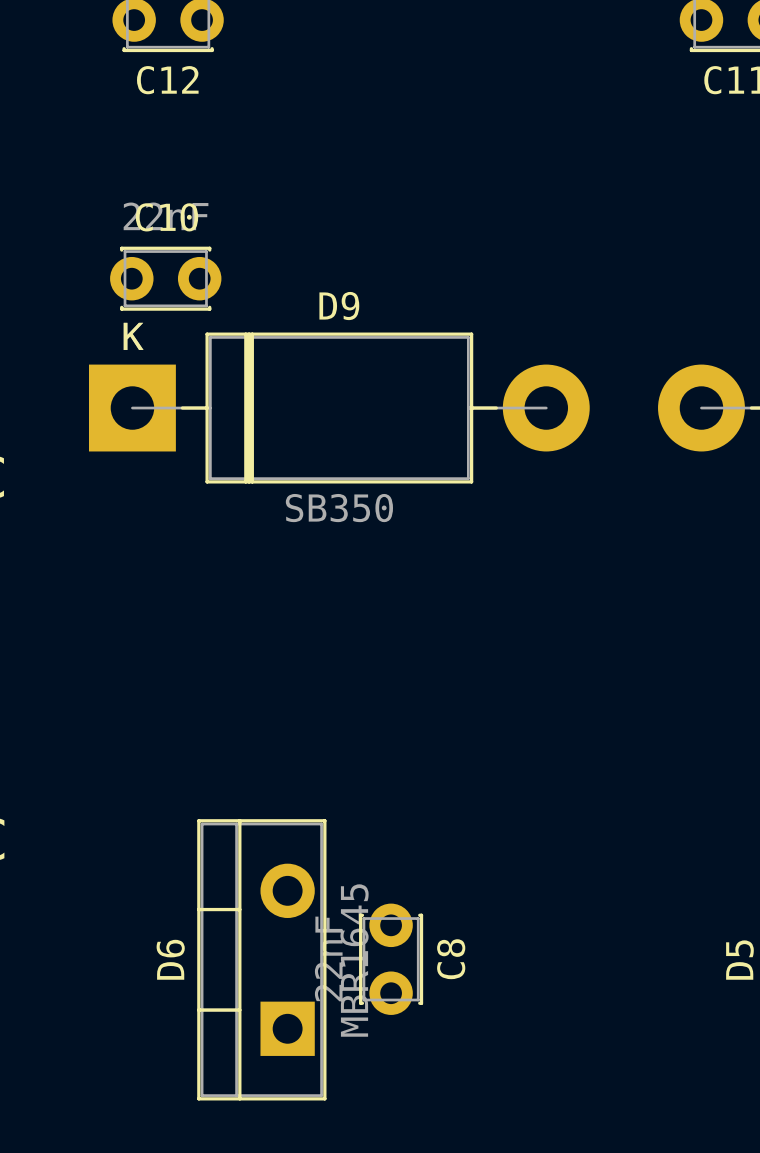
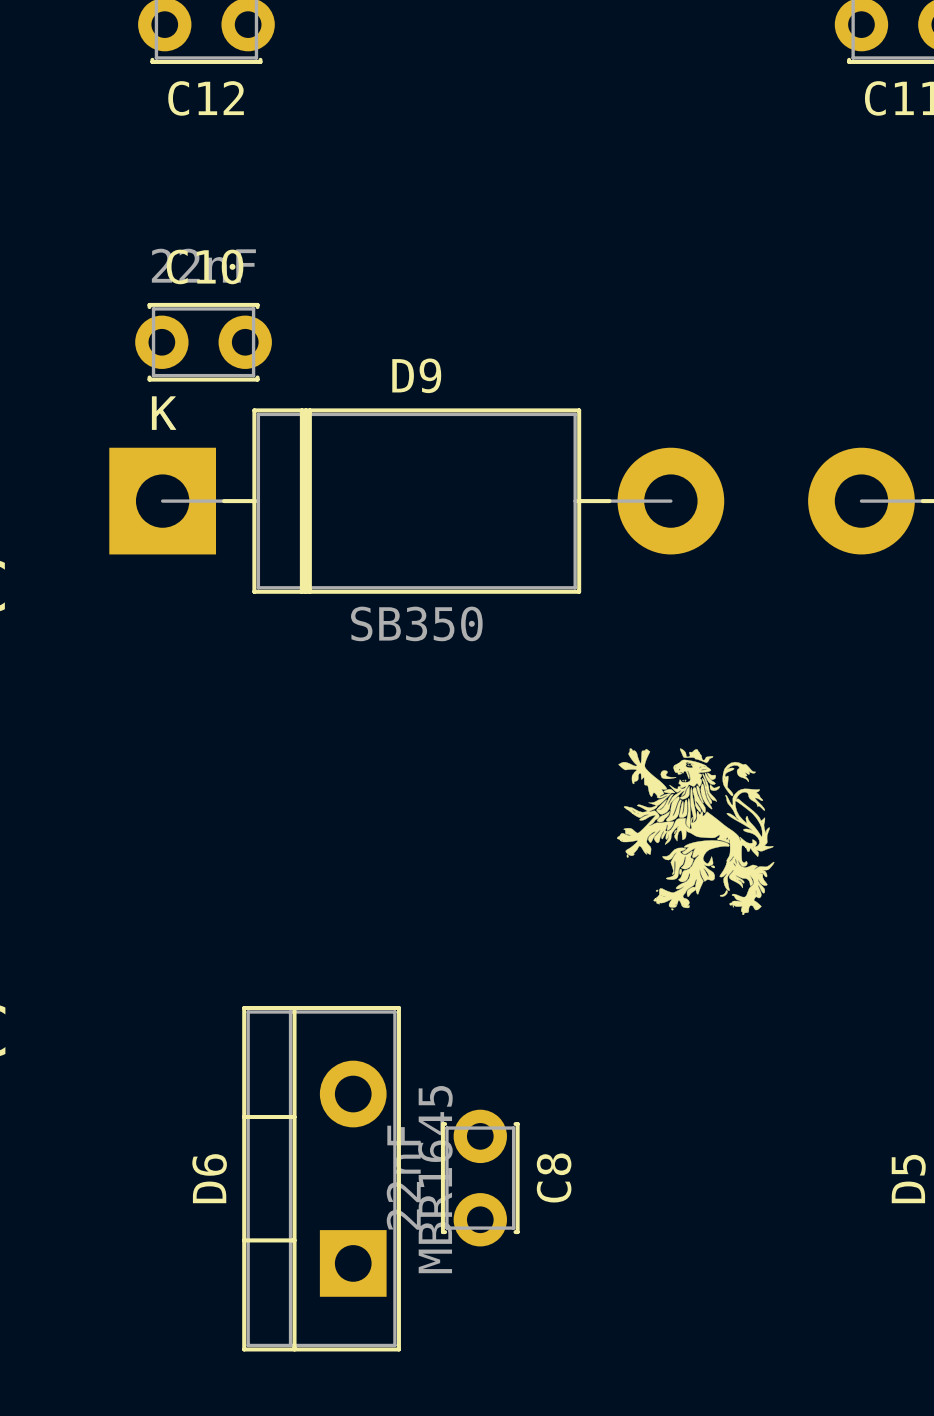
drawing: none -> [616, 748, 775, 916]

